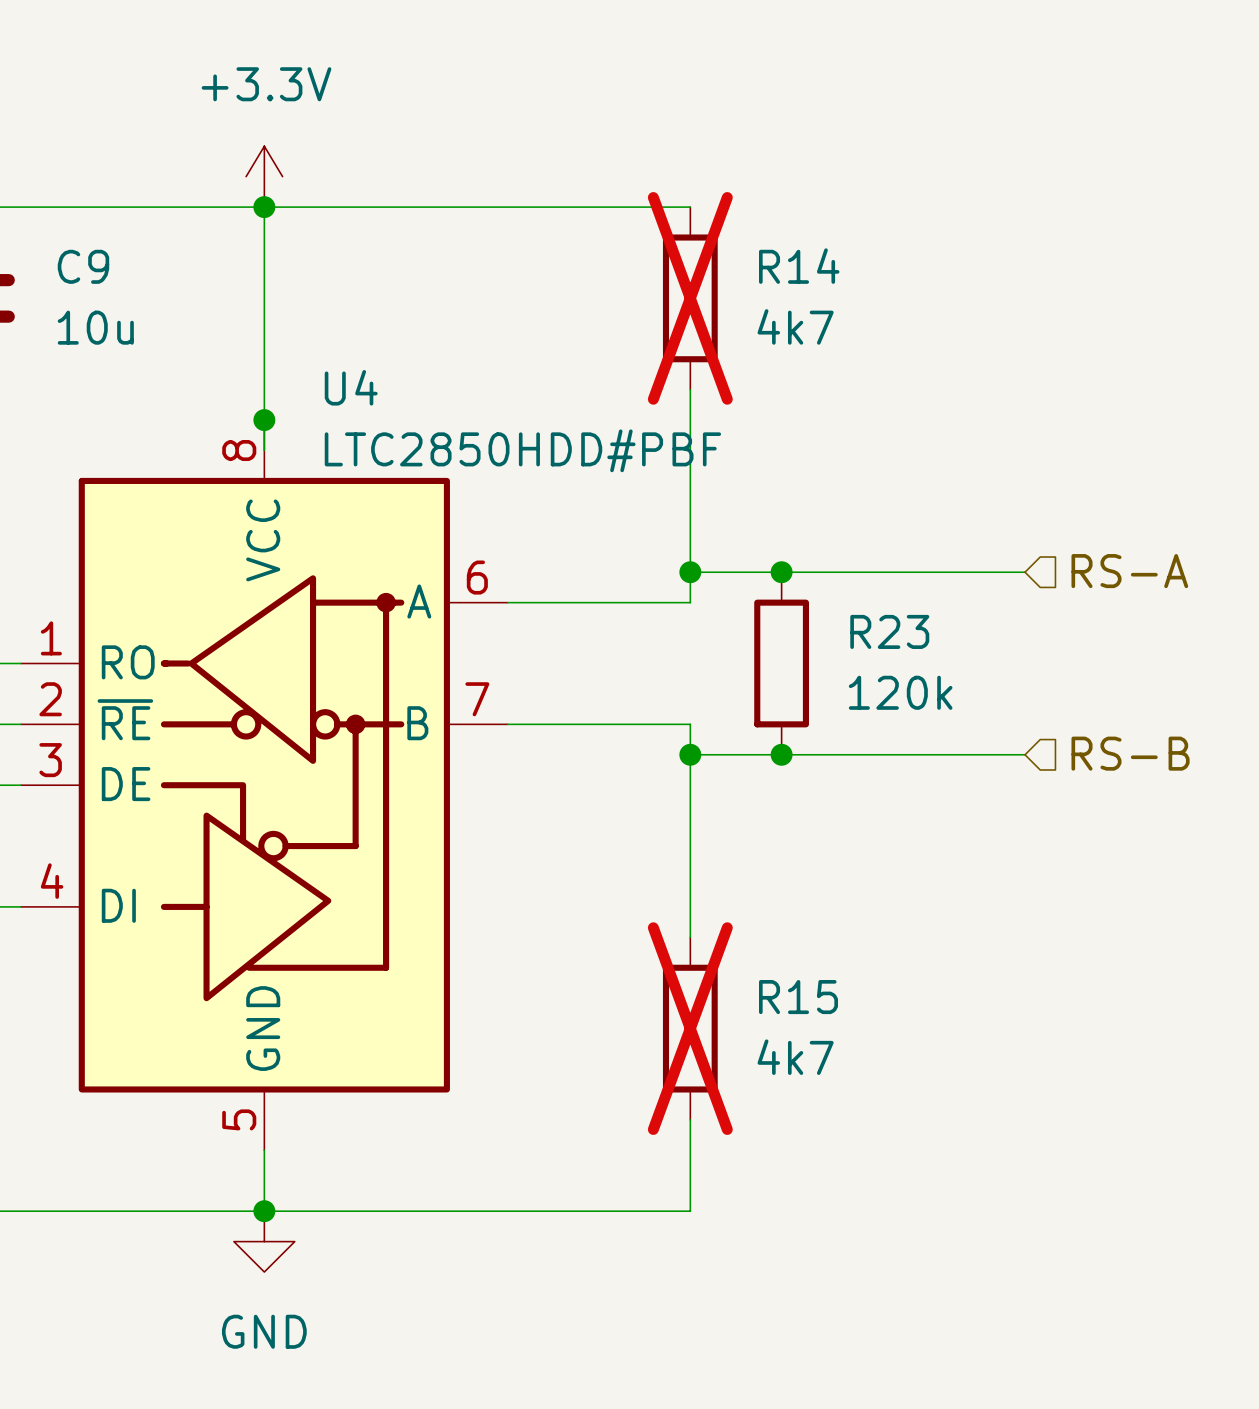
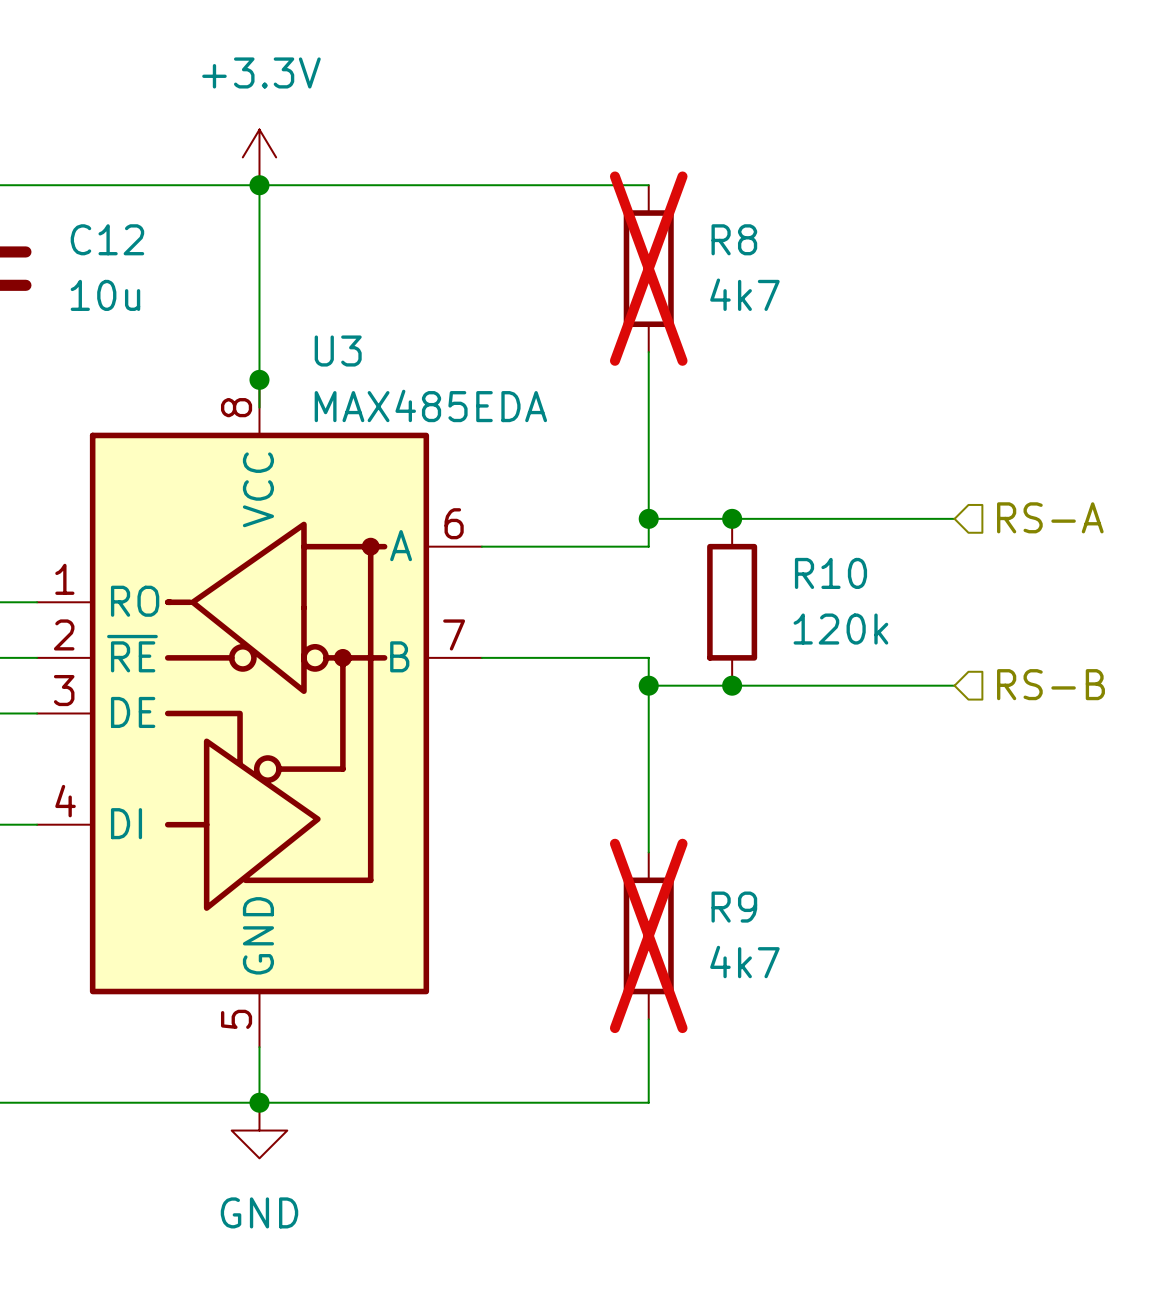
C9 name: C9 (83, 266) -> C12 (107, 239)
R14 name: R14 (799, 266) -> R8 (734, 239)
U4 name: U4 (351, 387) -> U3 (338, 351)
U4 value: LTC2850HDD#PBF (522, 450) -> MAX485EDA (430, 405)
R23 name: R23 (889, 631) -> R10 (830, 573)
R15 name: R15 (798, 997) -> R9 (734, 907)

